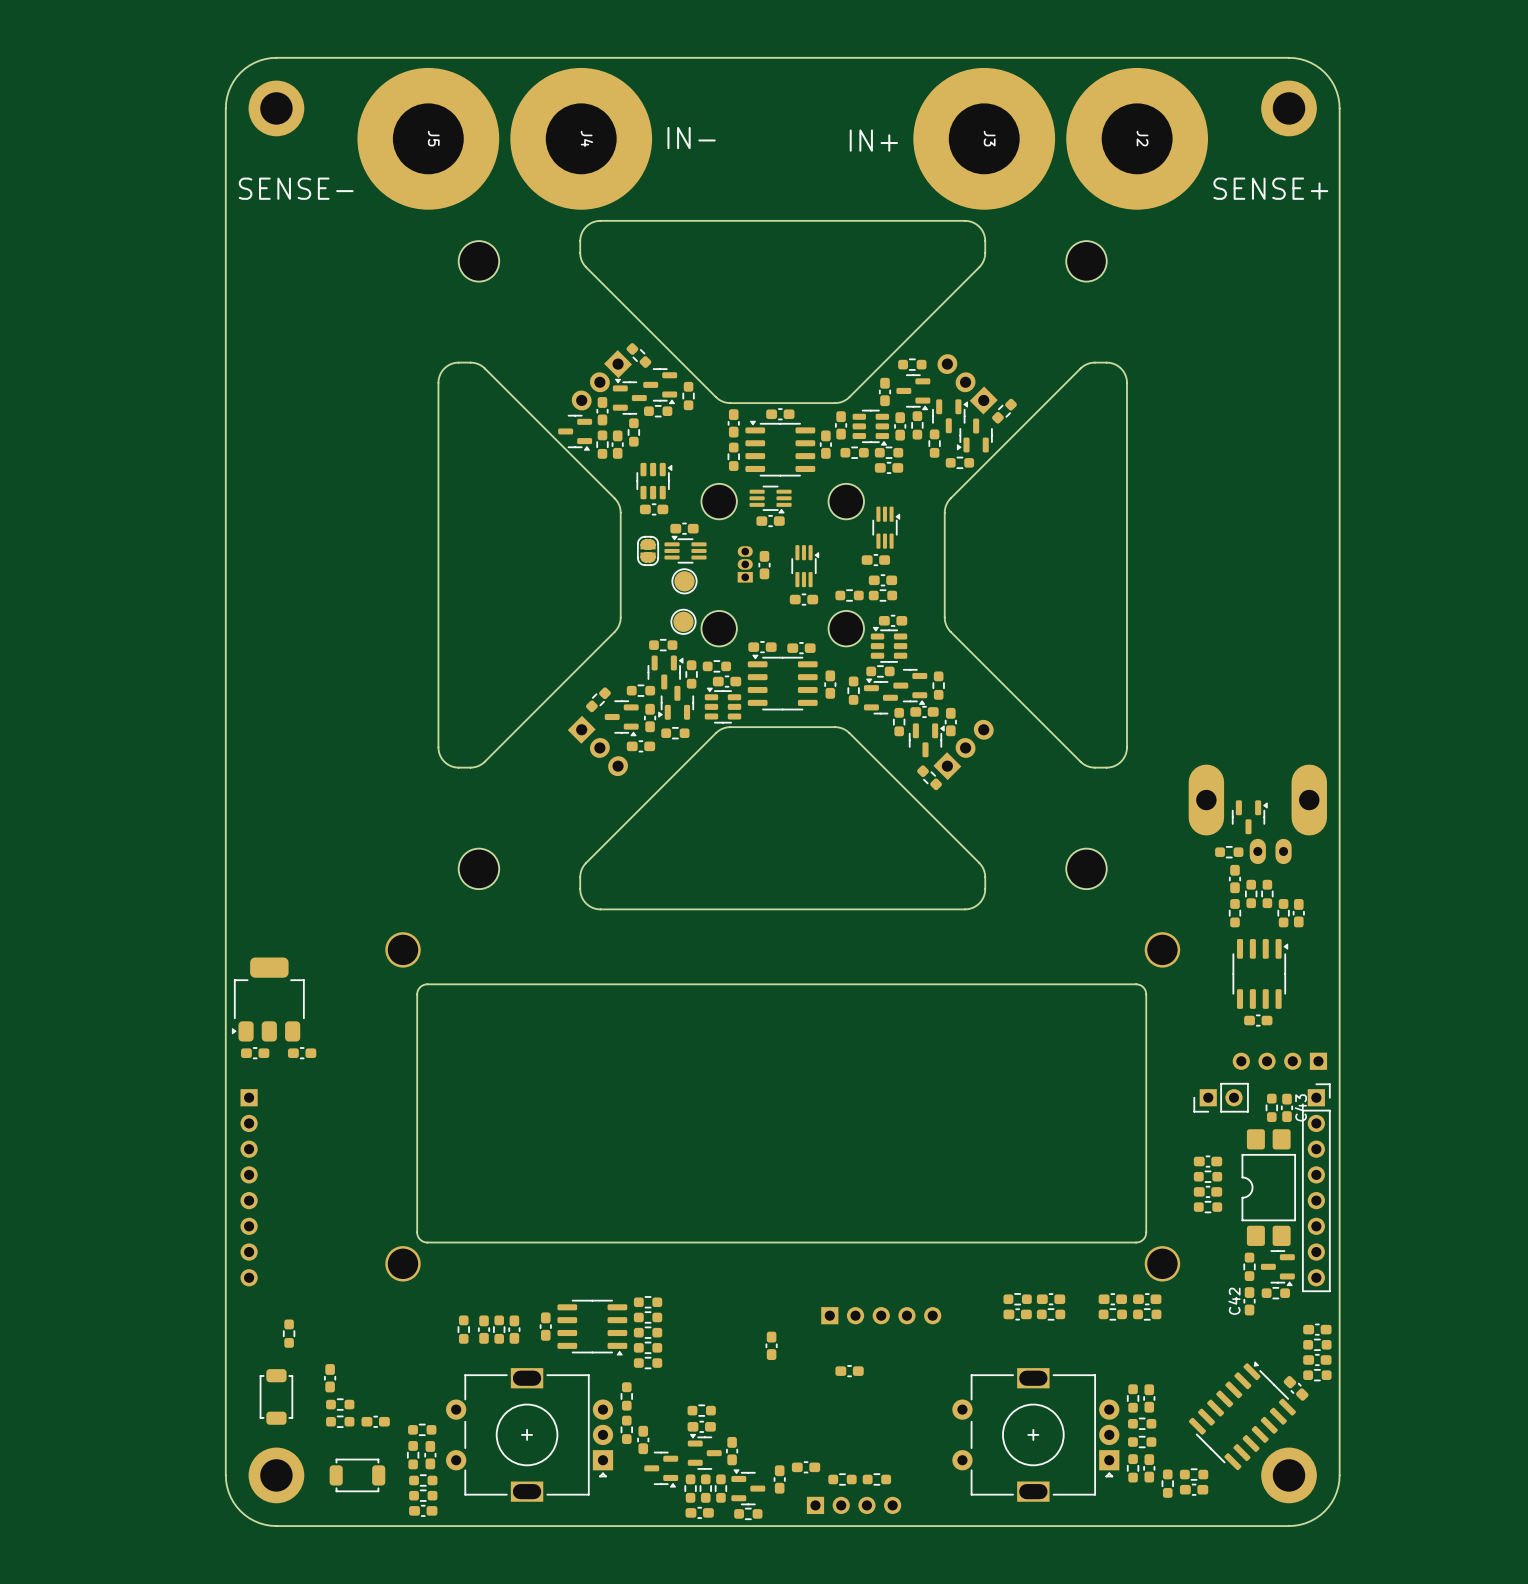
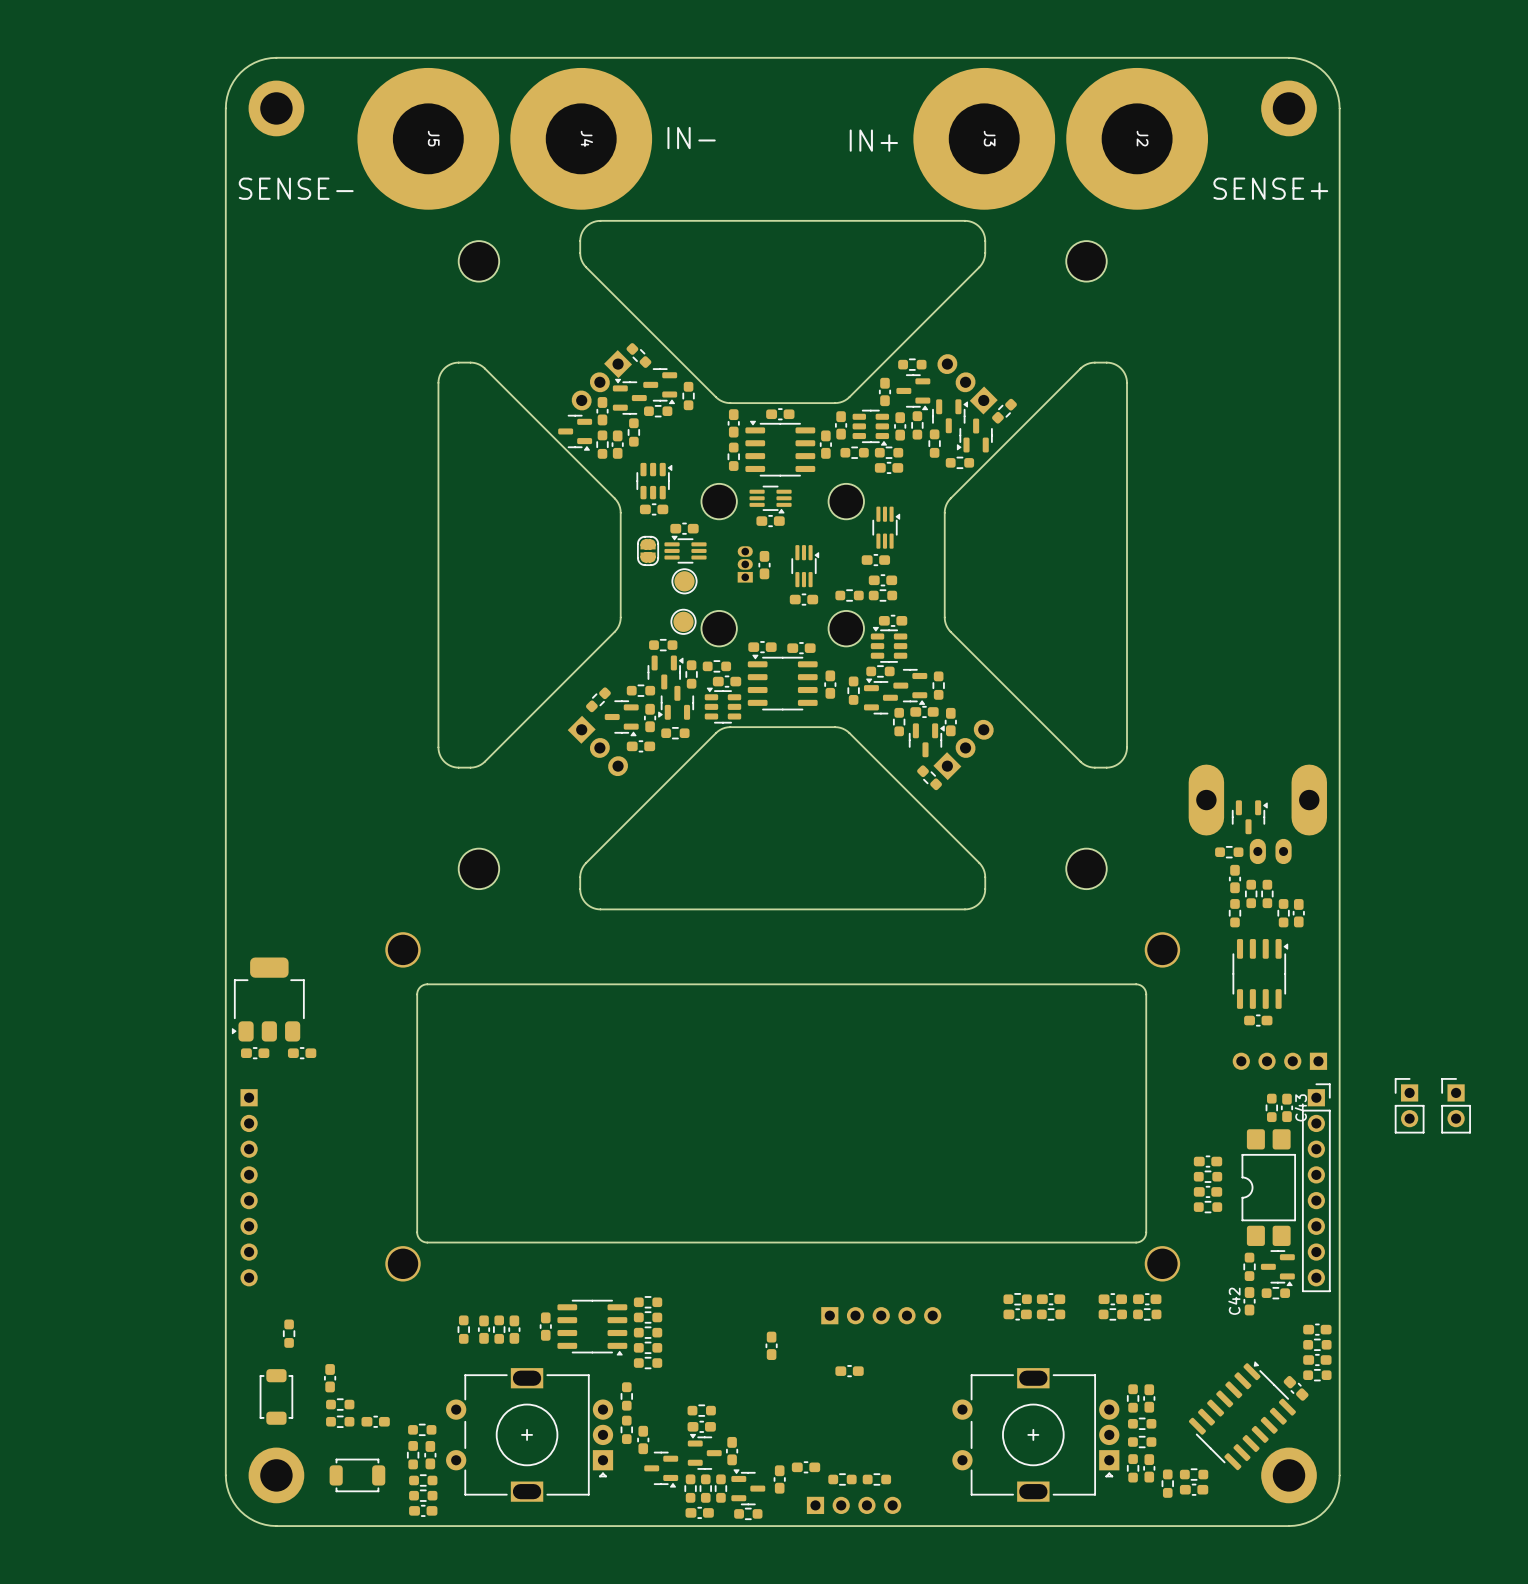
part: (1221, 1097) -> none
part: none -> (1409, 1105)
part: none -> (1456, 1105)

